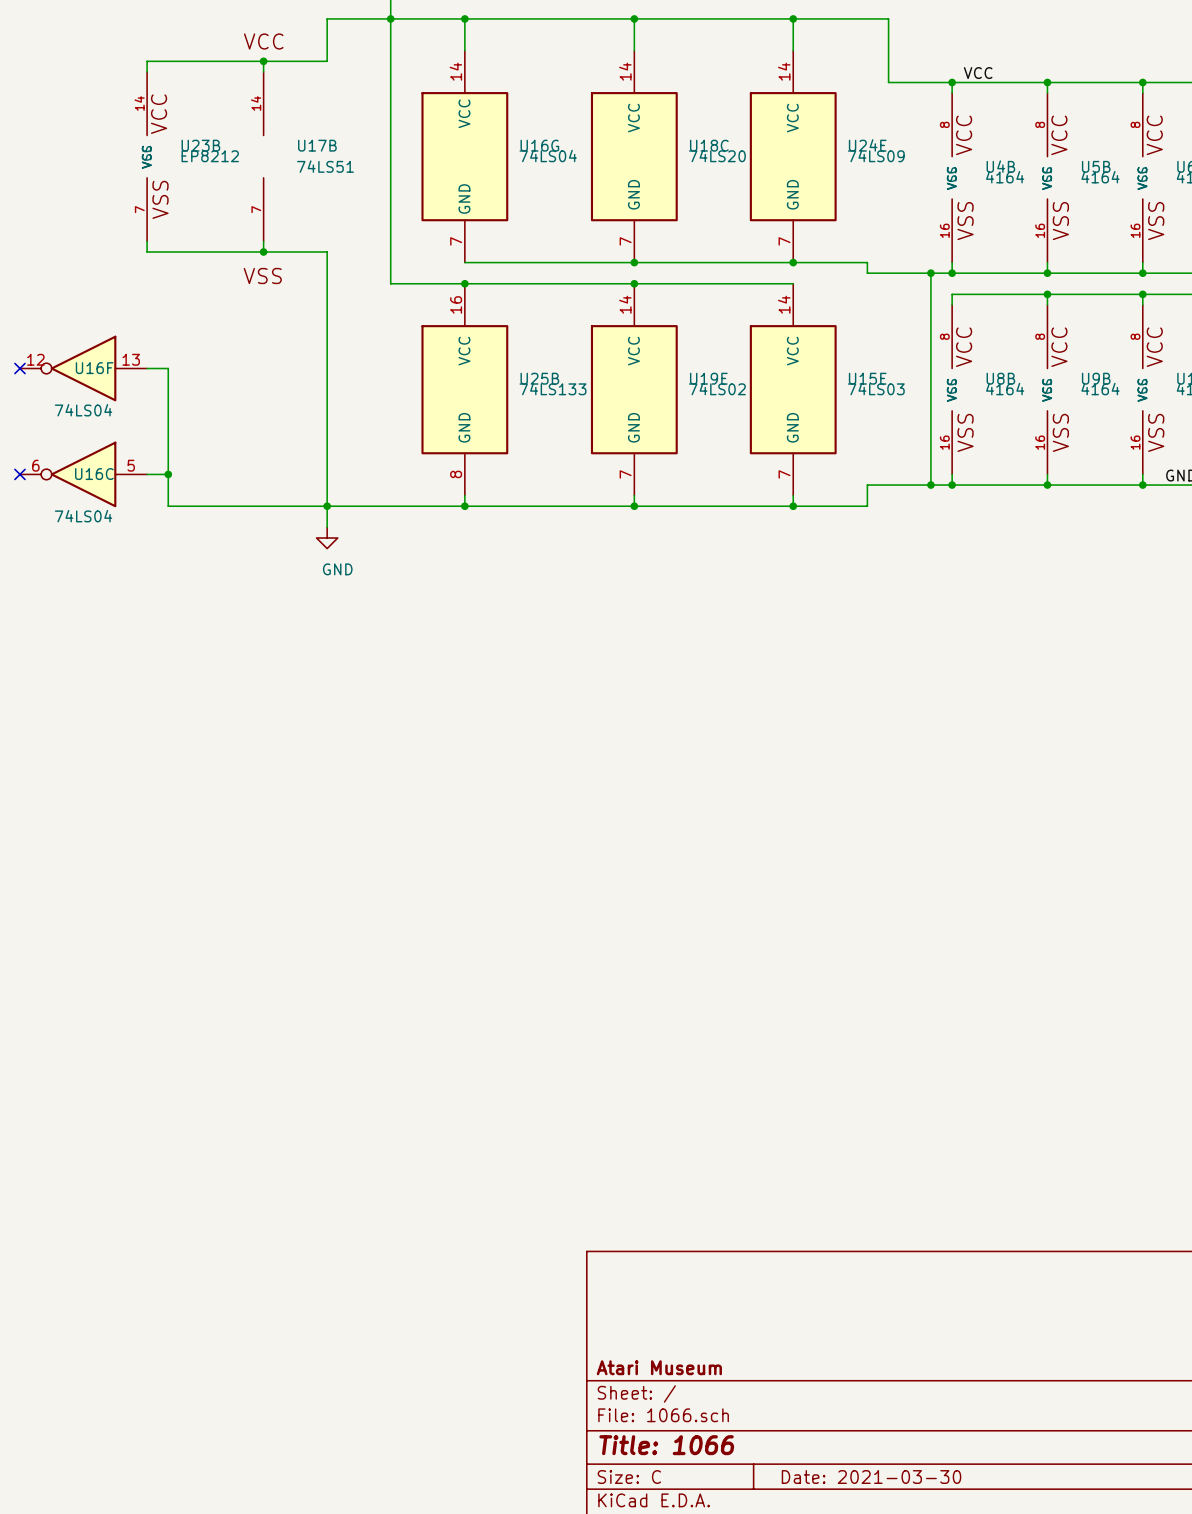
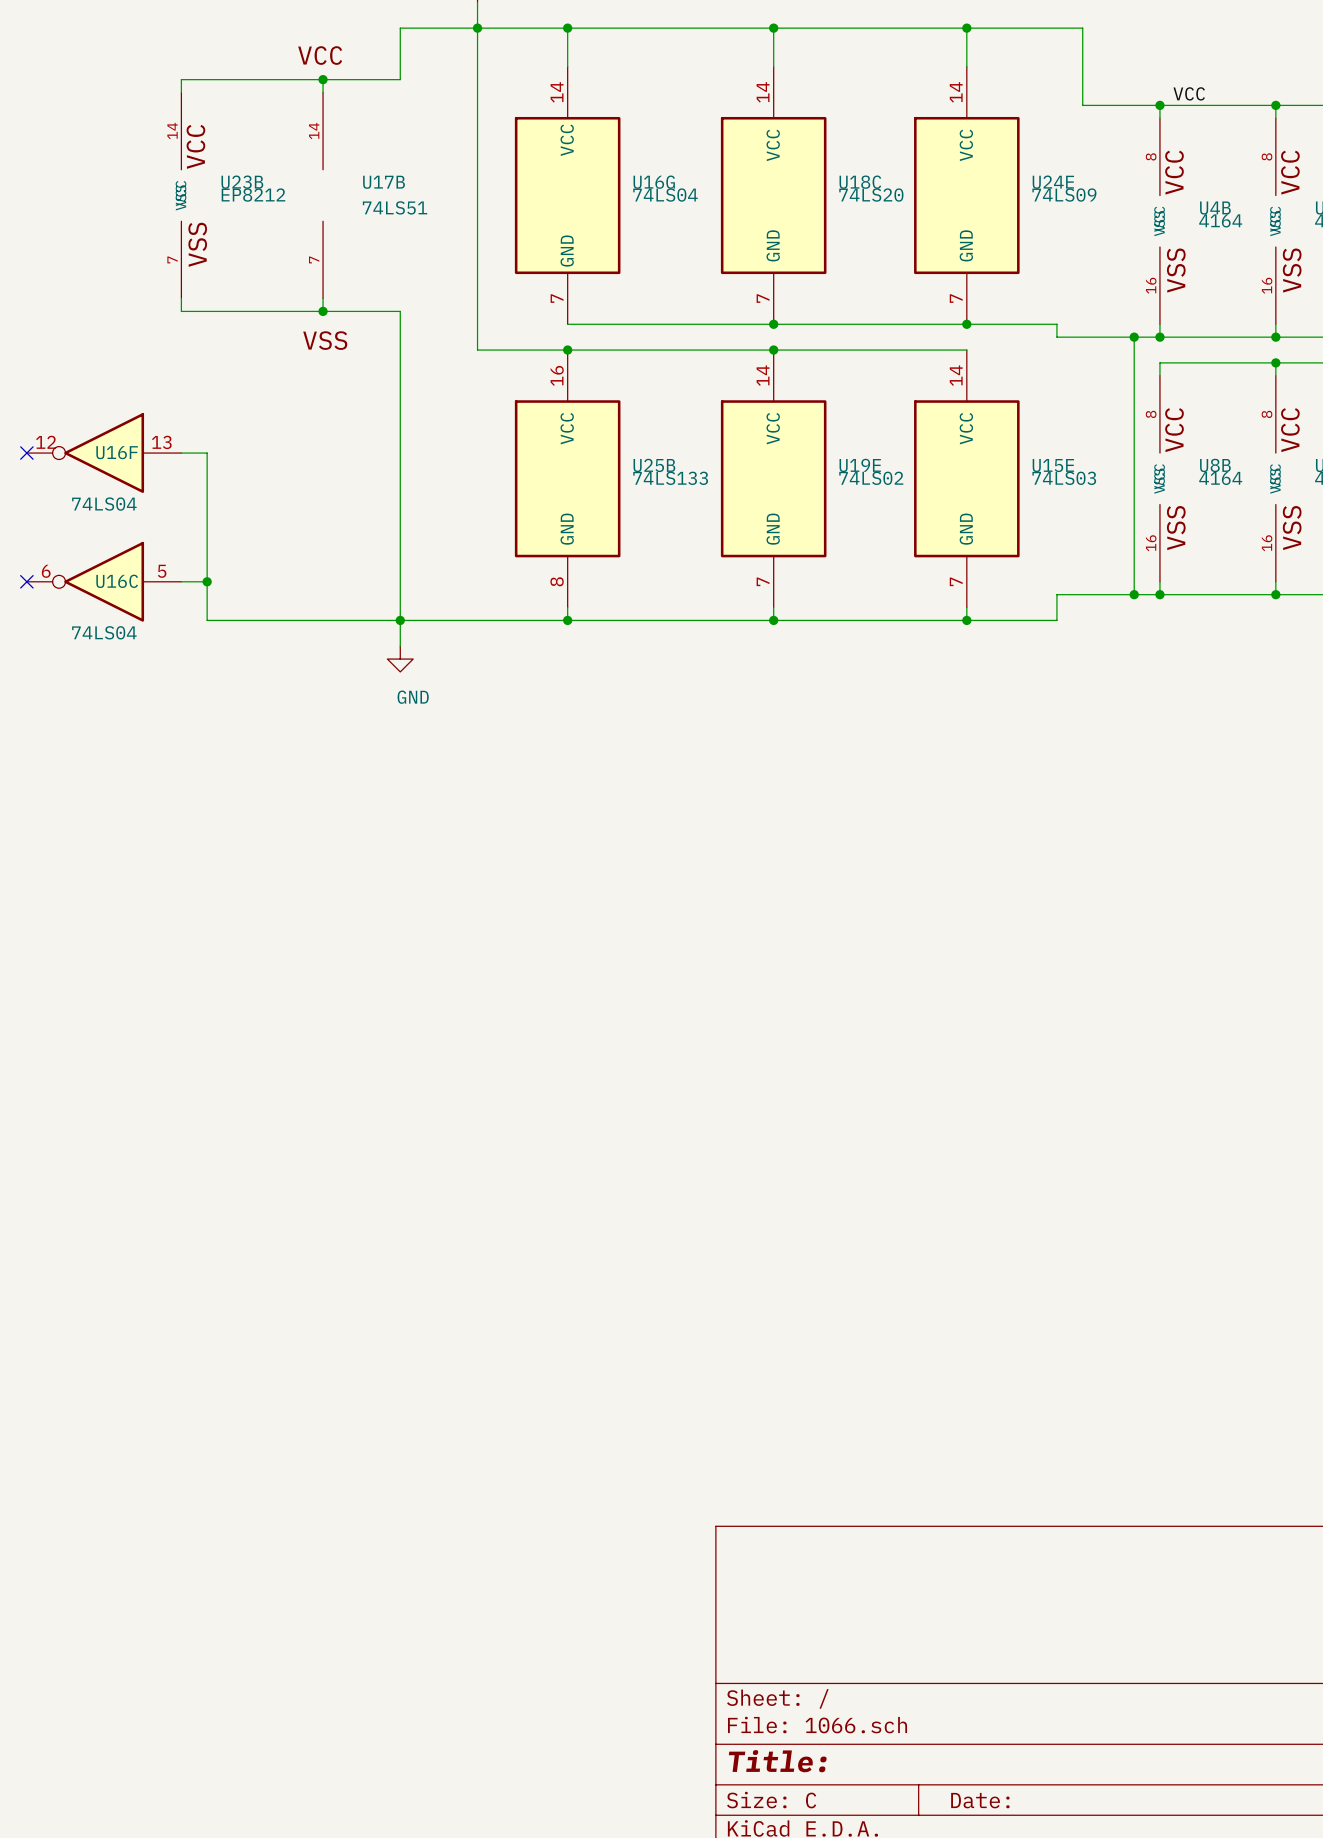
title block: Atari Museum (659, 1367) -> none
title block: Title: 1066 (666, 1445) -> Title: (777, 1761)
title block: Date: 2021-03-30 (871, 1477) -> Date: (980, 1800)

